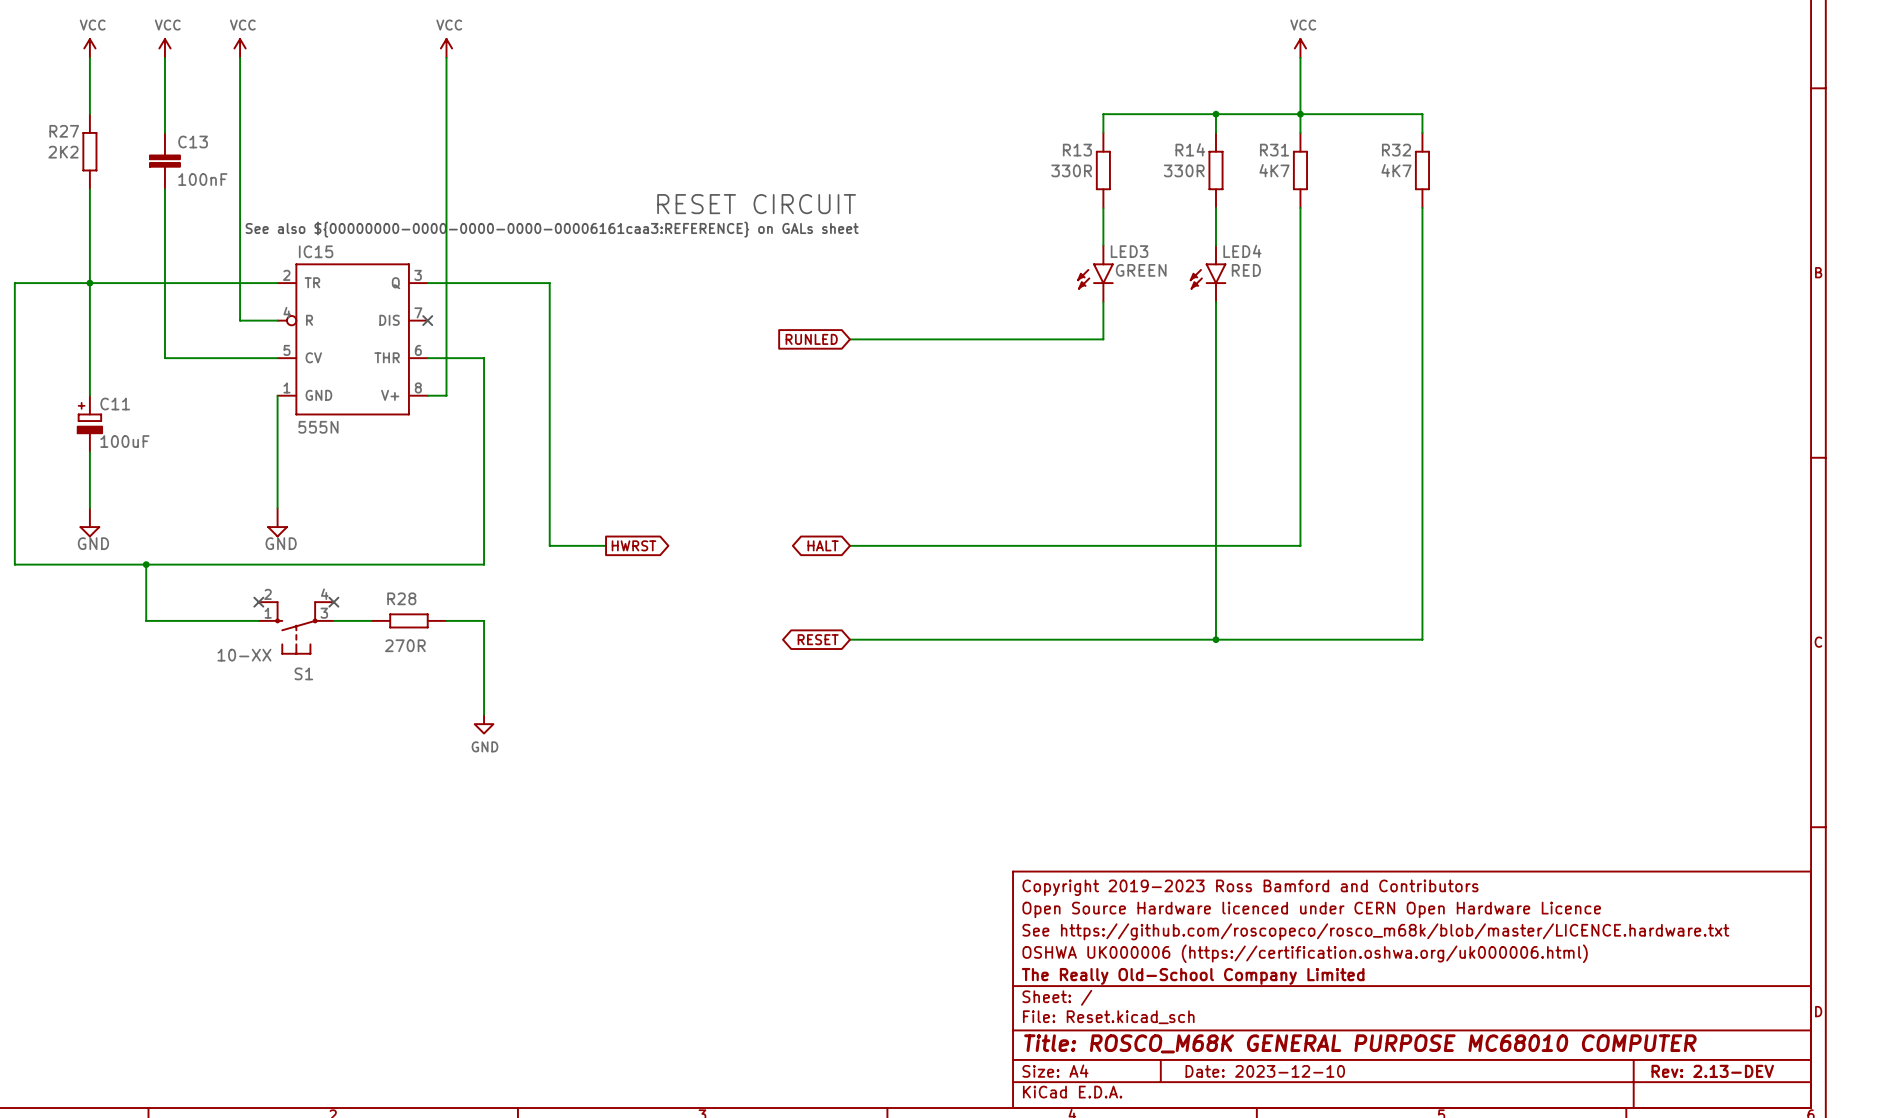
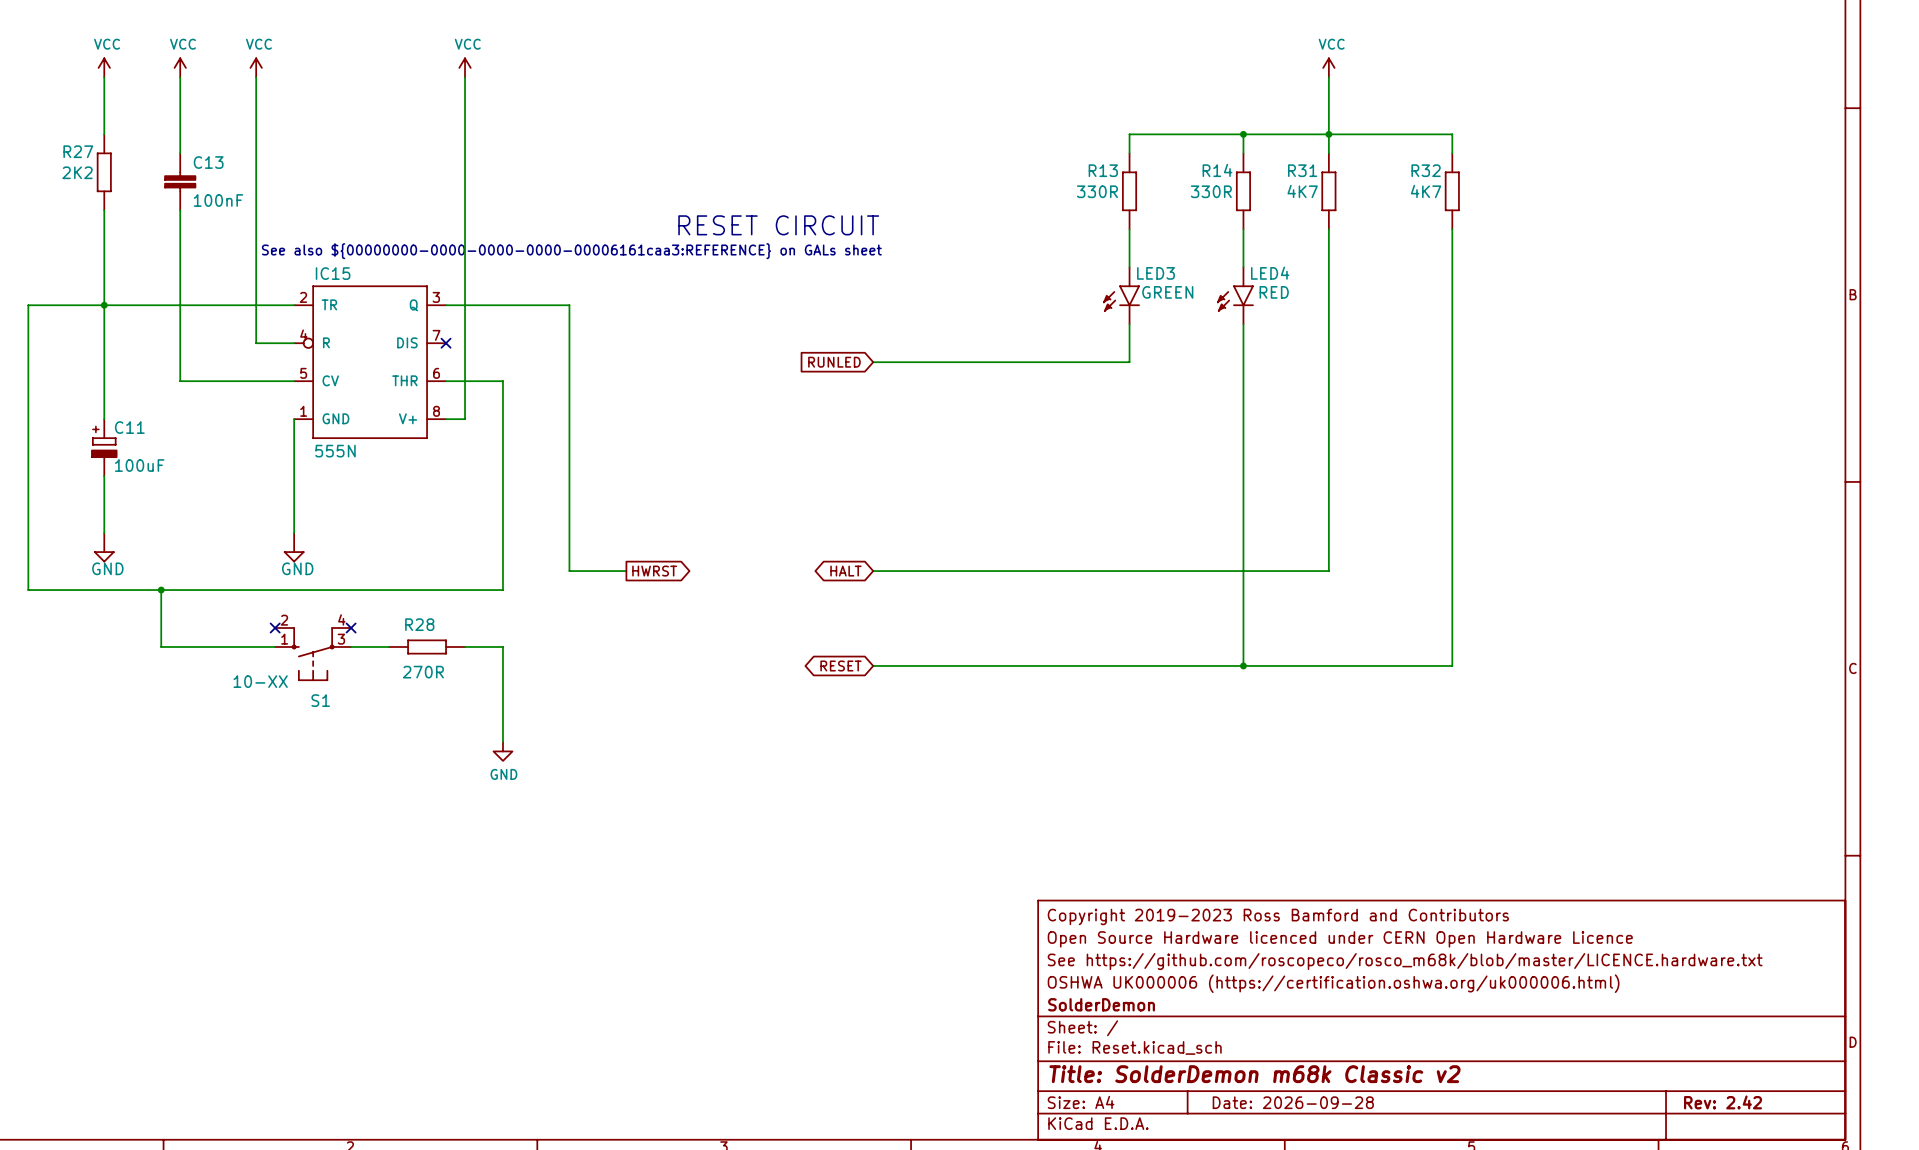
title block: The Really Old-School Company Limited (1193, 976) -> SolderDemon (1101, 1004)
title block: Title: ROSCO_M68K GENERAL PURPOSE MC68010 COMPUTER (1360, 1043) -> Title: SolderDemon m68k Classic v2 (1254, 1074)
title block: Date: 2023-12-10 (1265, 1071) -> Date: 2026-09-28 (1293, 1102)
title block: Rev: 2.13-DEV (1712, 1071) -> Rev: 2.42 (1723, 1102)

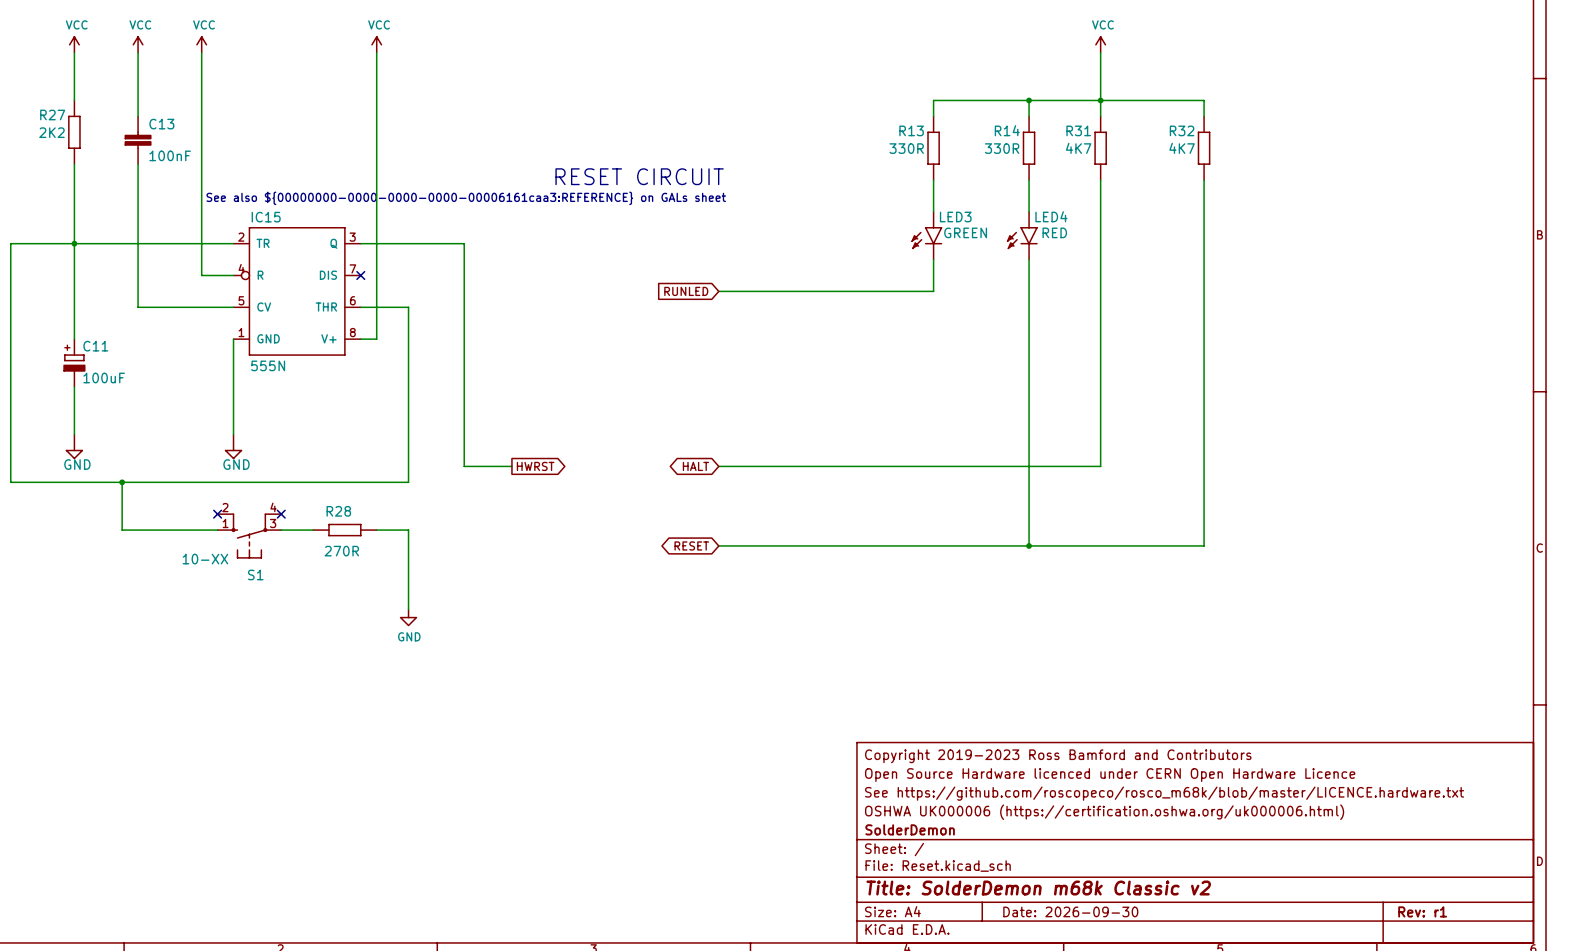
title block: Date: 2026-09-28 (1293, 1102) -> Date: 2026-09-30 (1070, 911)
title block: Rev: 2.42 (1723, 1102) -> Rev: r1 (1422, 911)

